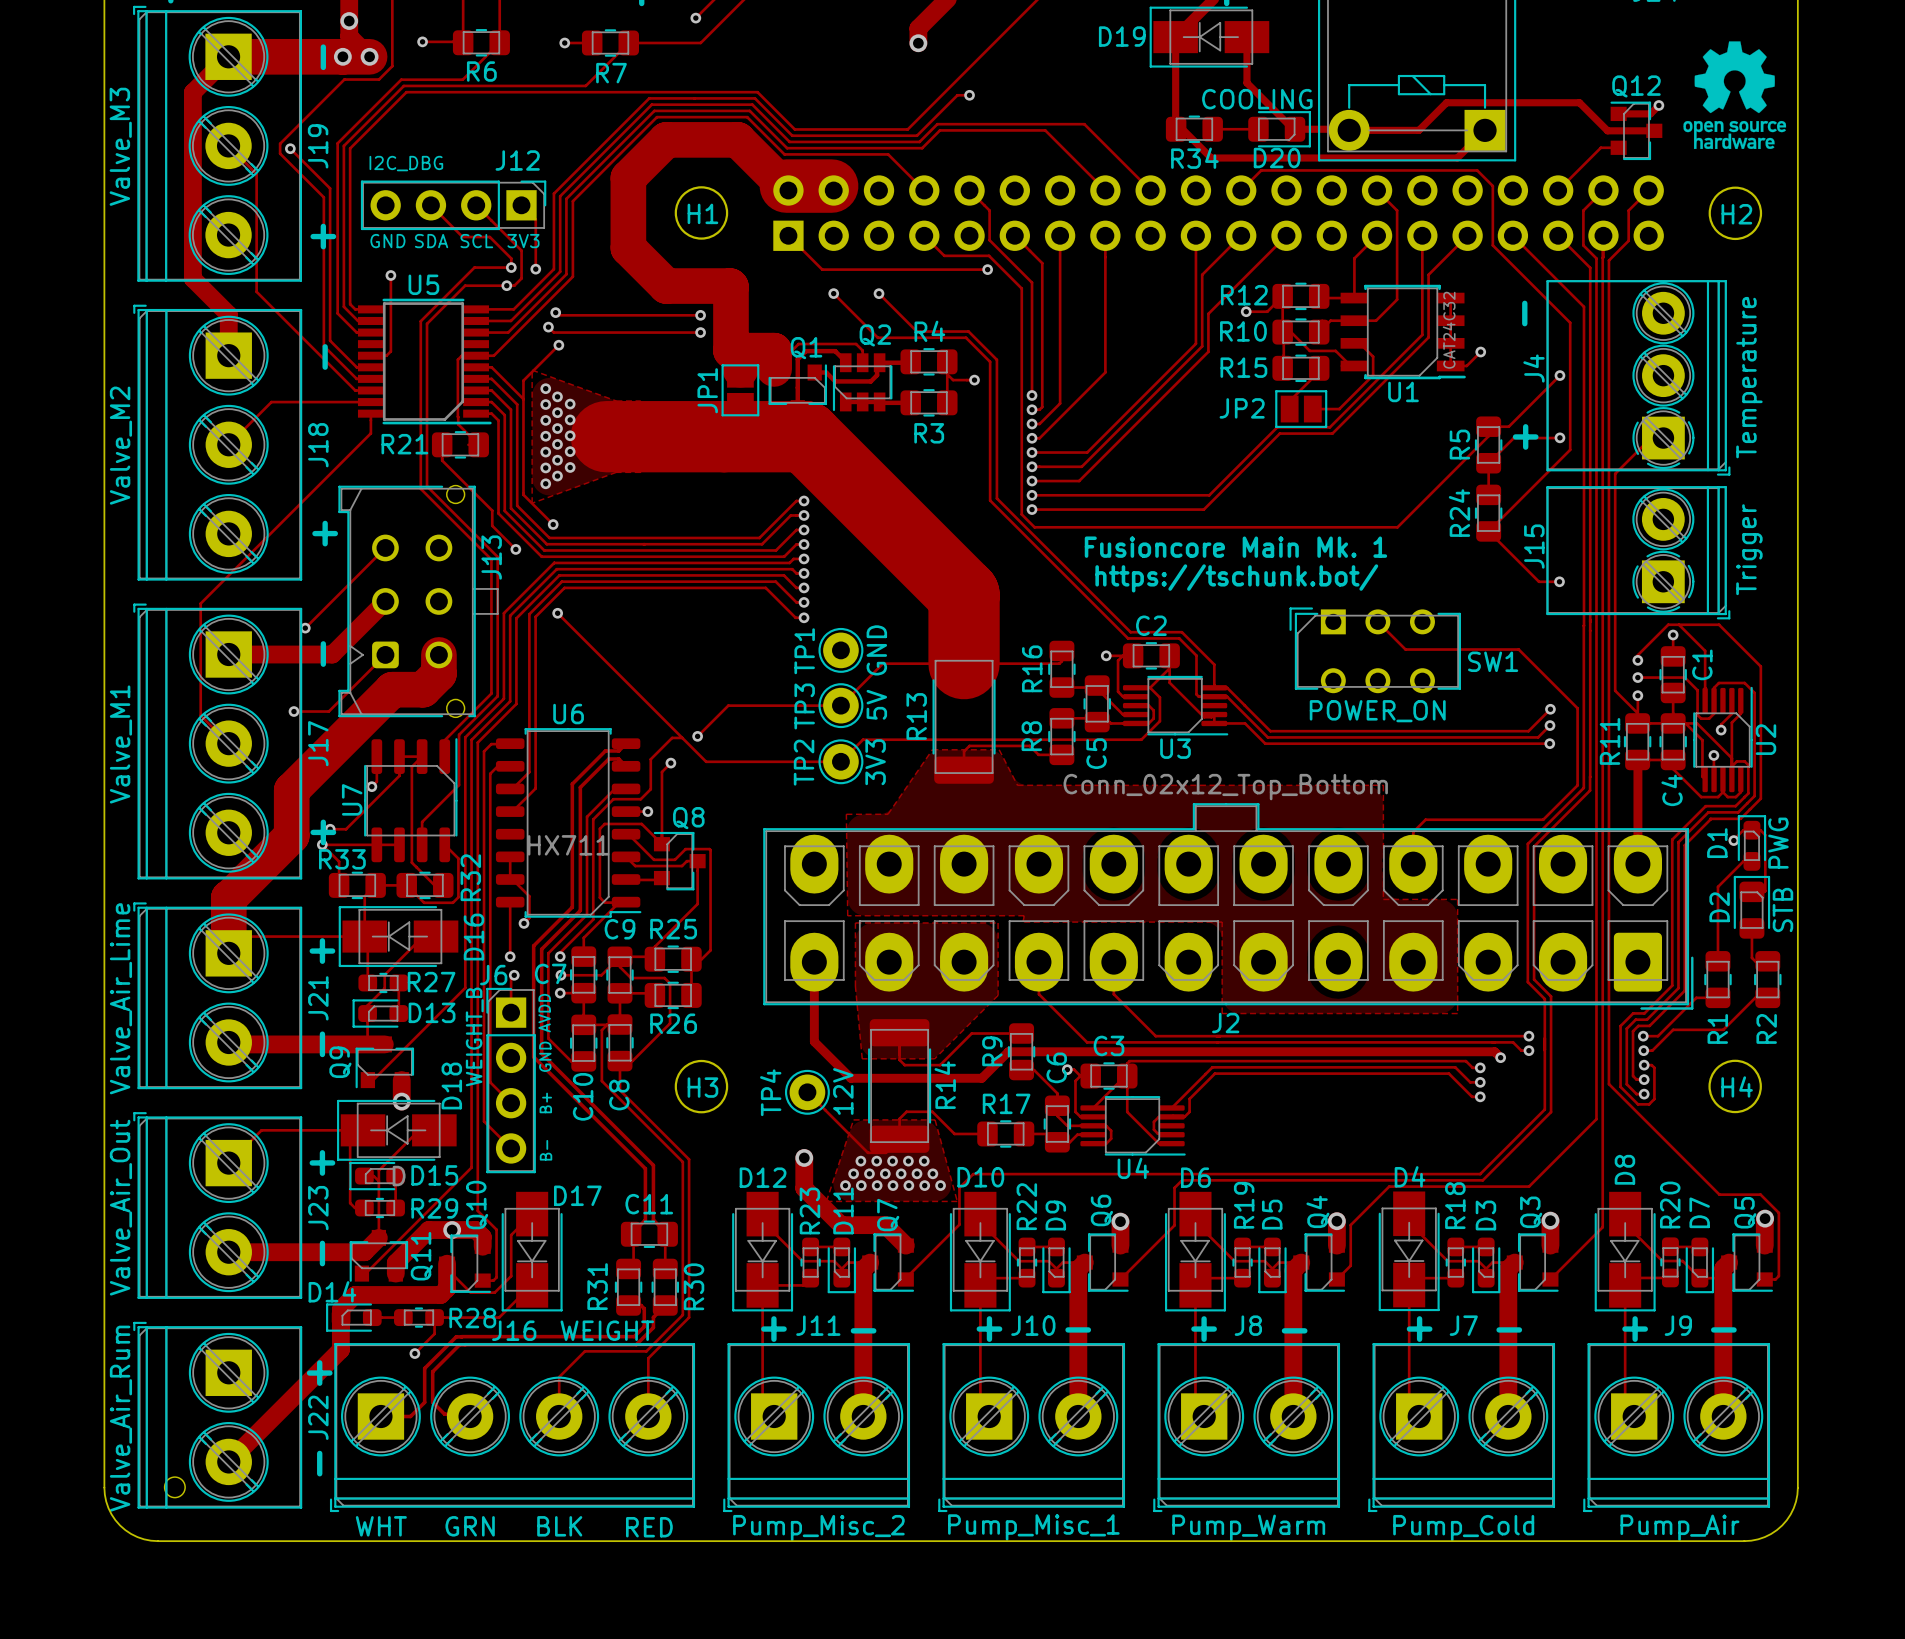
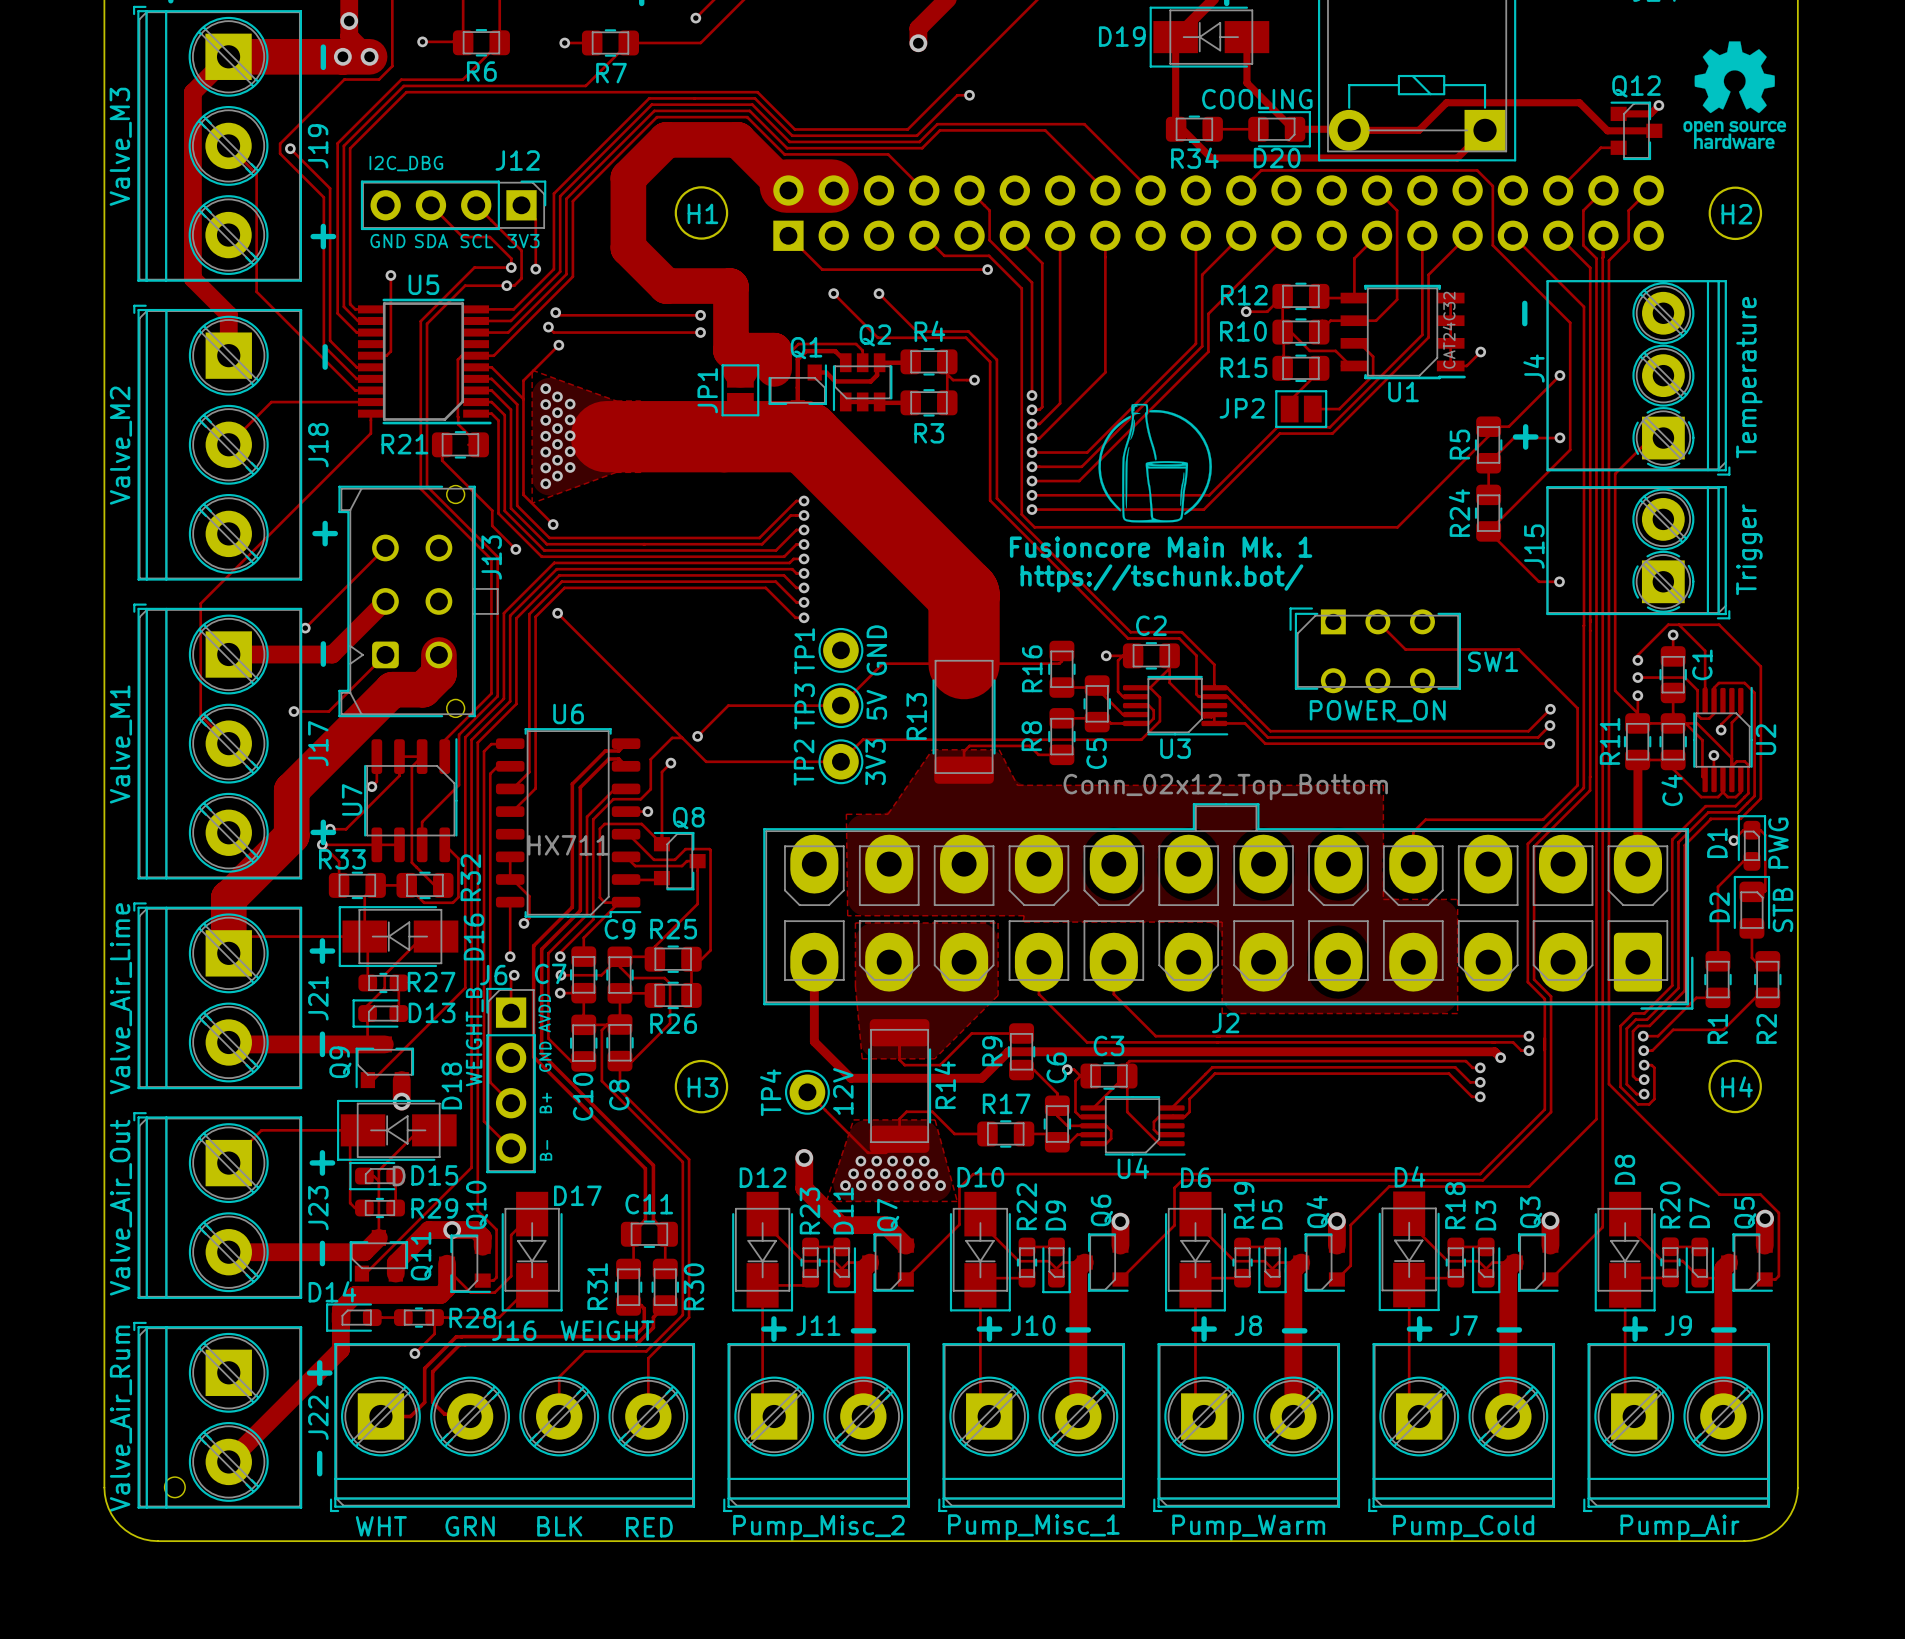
drawing: none -> [1098, 403, 1212, 523]
text position: Fusioncore Main Mk. 1 (1235, 547) -> Fusioncore Main Mk. 1 (1161, 547)
text position: https://tschunk.bot/ (1236, 578) -> https://tschunk.bot/ (1161, 578)

